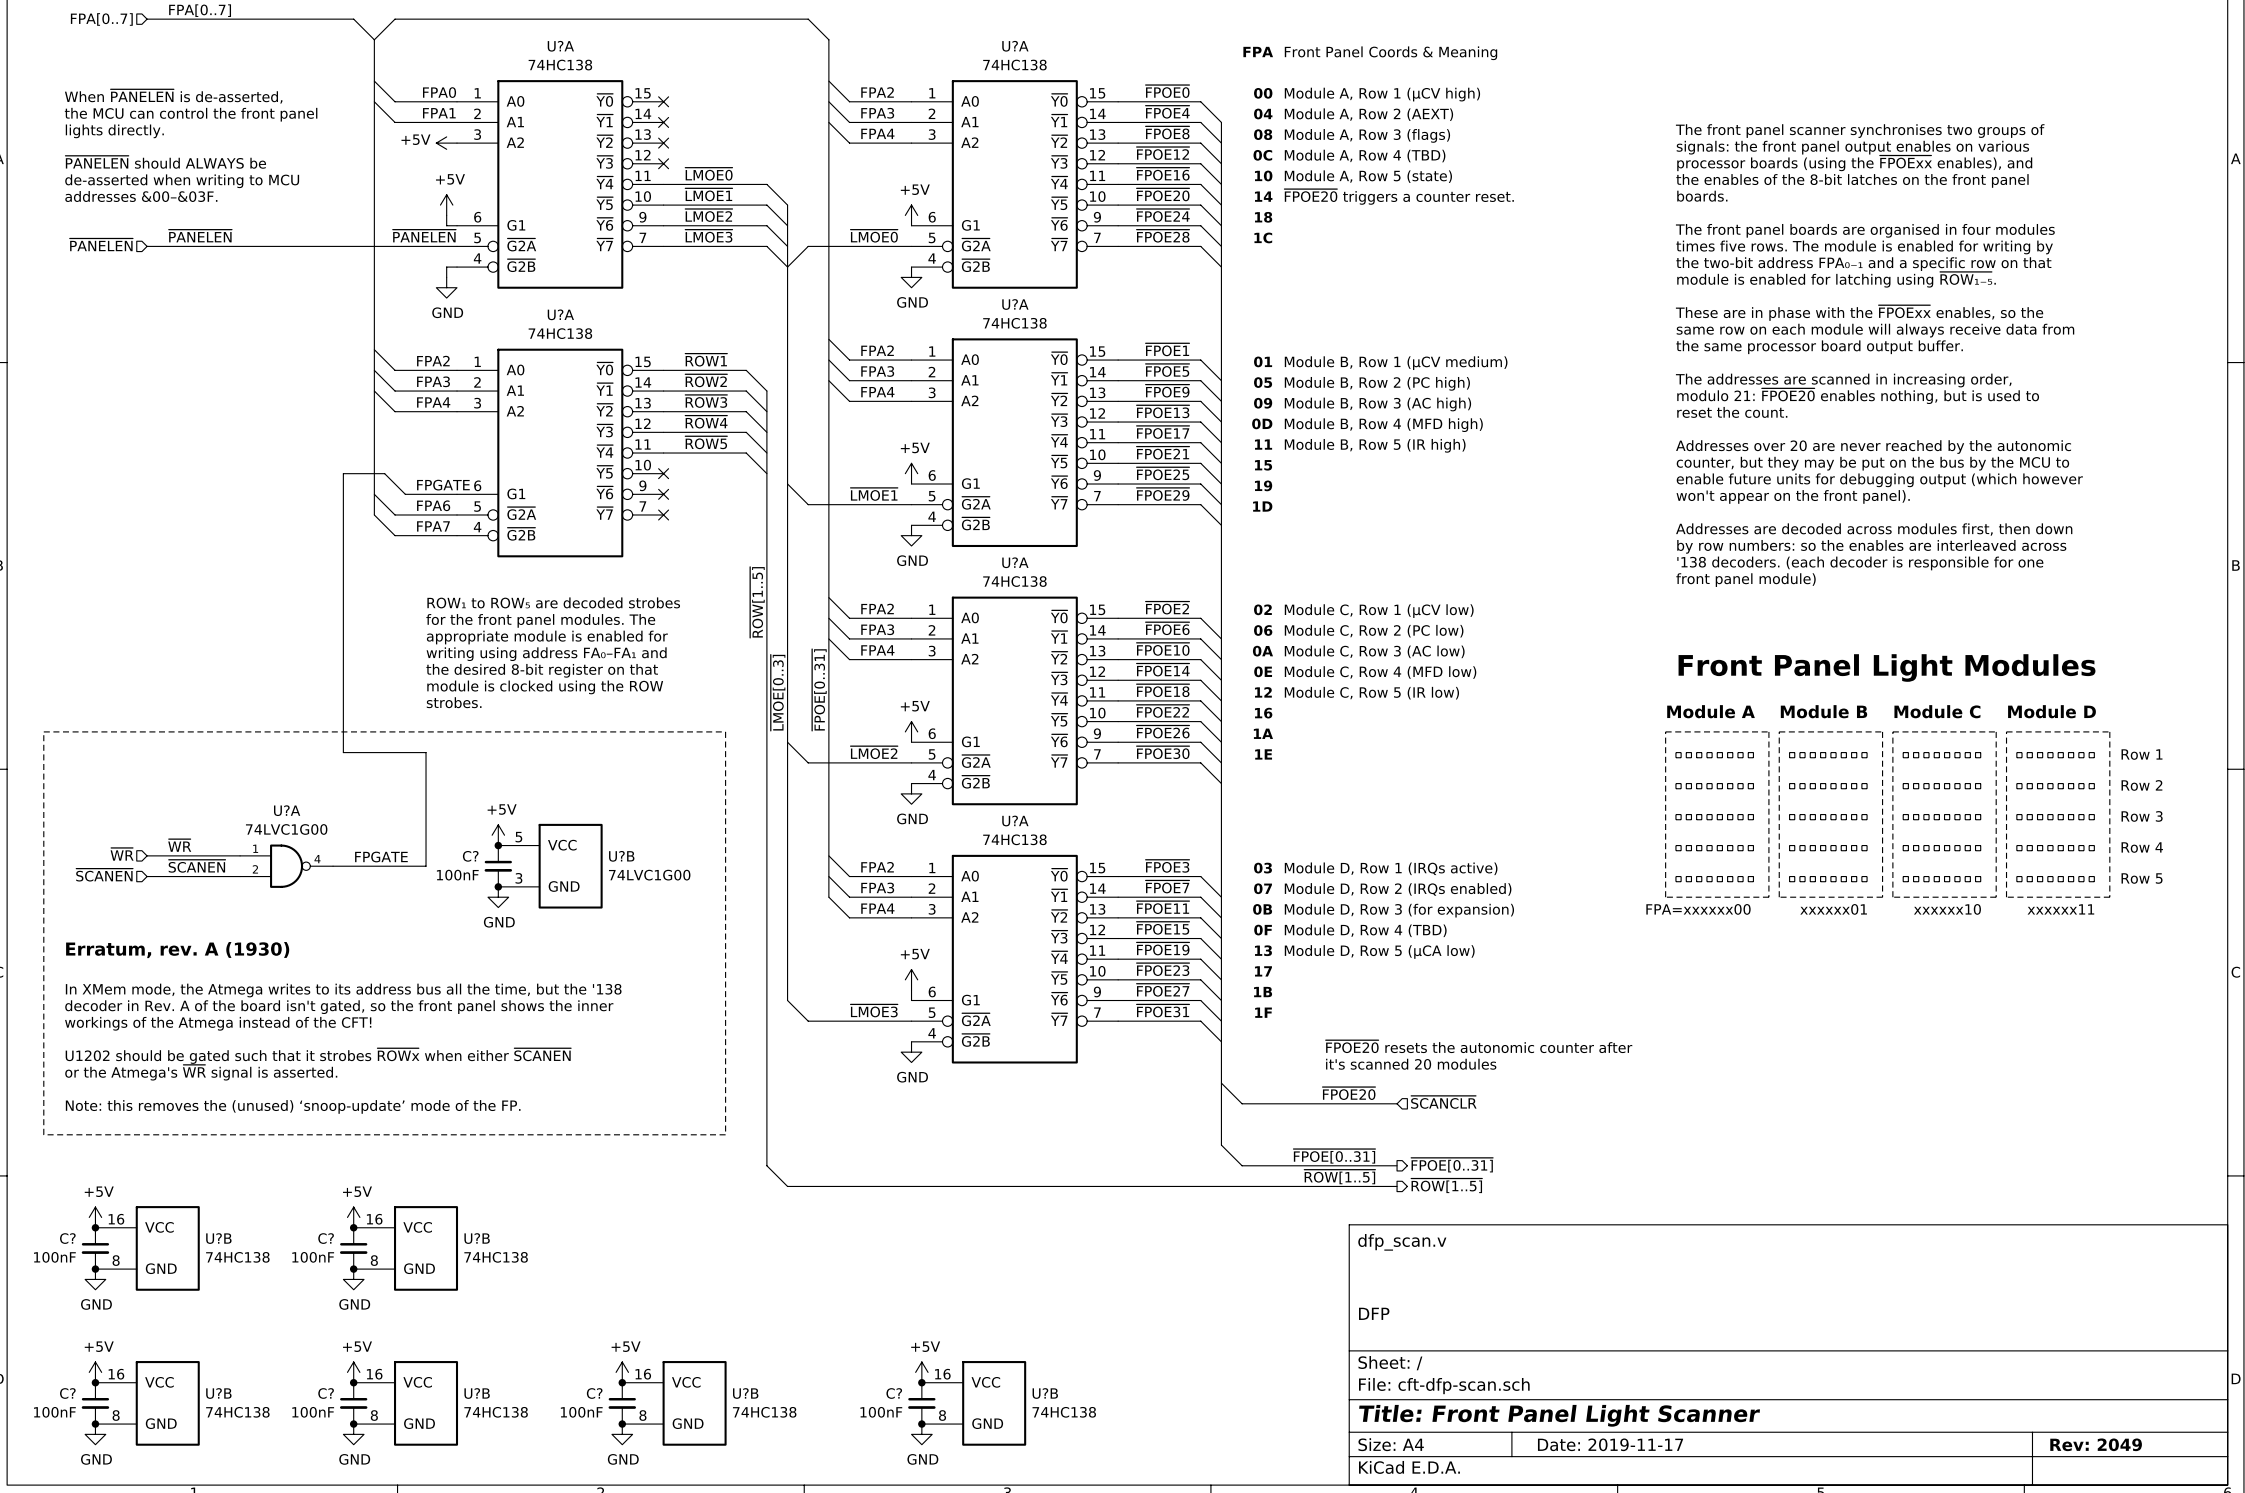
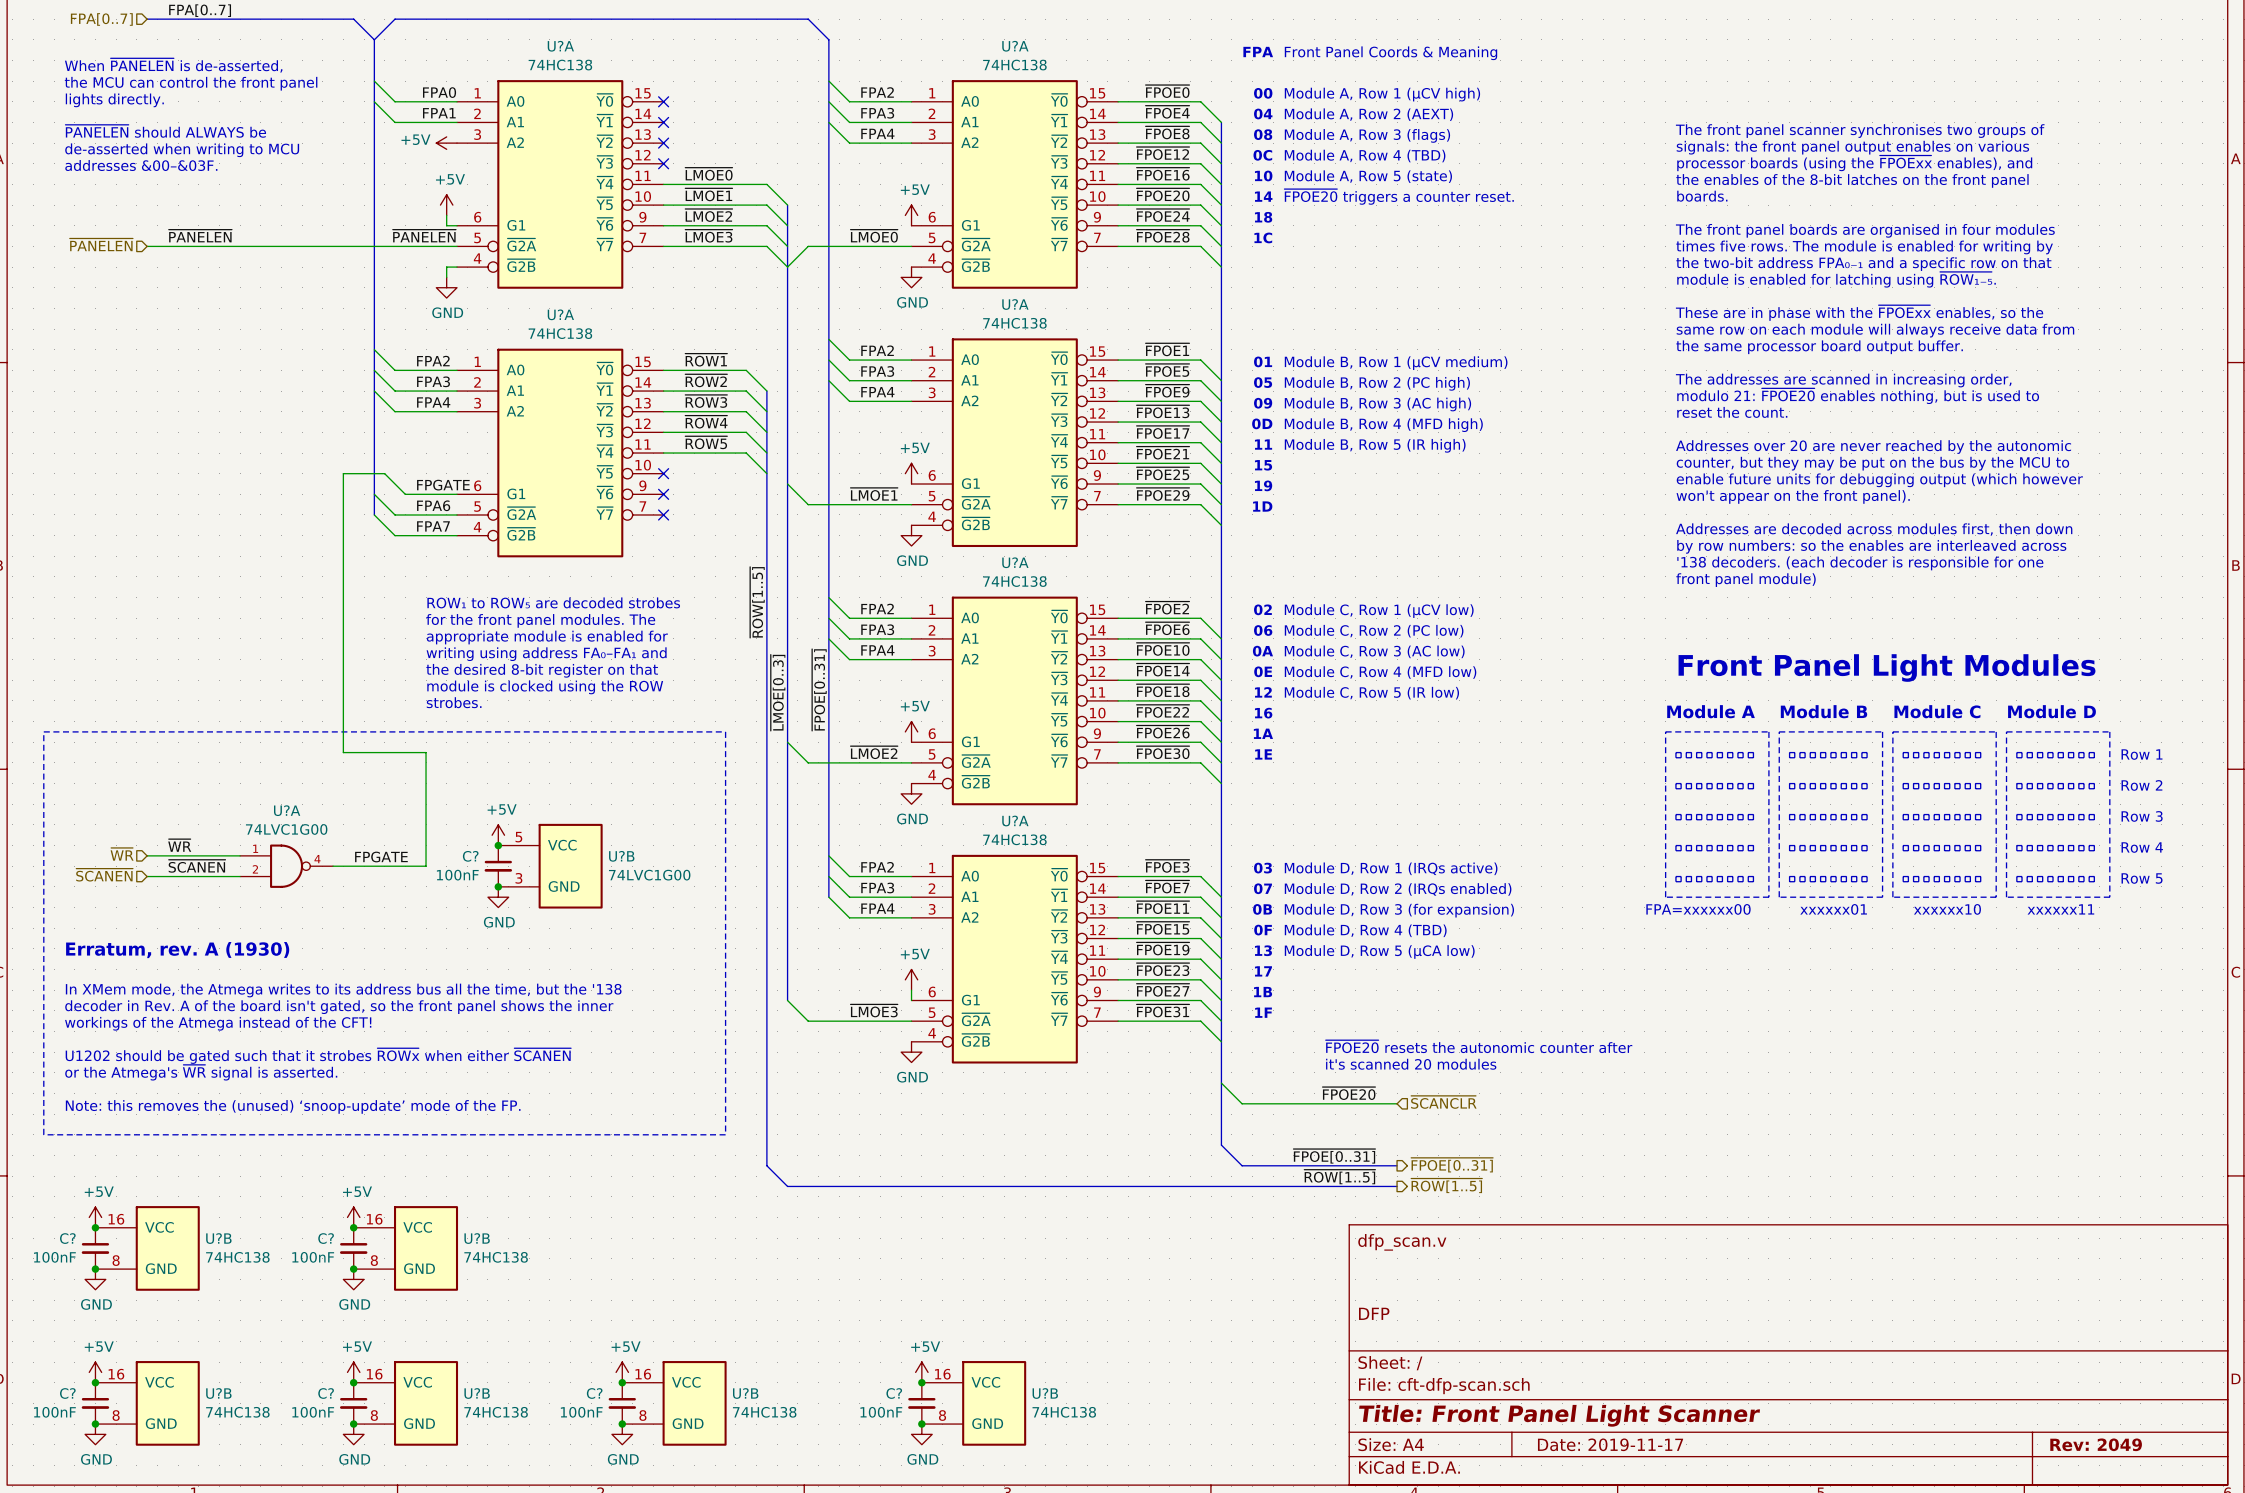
text position: When ~{PANELEN} is de-asserted, (173, 96) -> When ~{PANELEN} is de-asserted, (173, 65)
text position: the MCU can control the front panel (191, 114) -> the MCU can control the front panel (191, 83)
text position: lights directly. (114, 131) -> lights directly. (114, 100)
text position: ~{PANELEN} should ALWAYS be (165, 162) -> ~{PANELEN} should ALWAYS be (165, 131)
text position: de-asserted when writing to MCU (182, 181) -> de-asserted when writing to MCU (182, 150)
text position: addresses &00–&03F. (141, 196) -> addresses &00–&03F. (141, 165)

